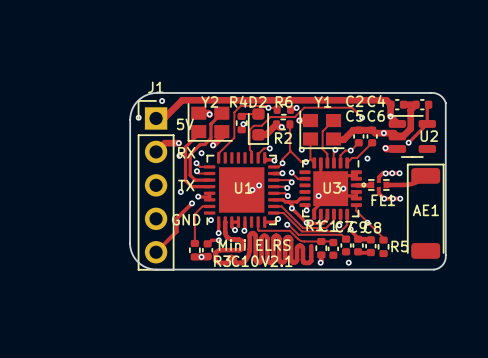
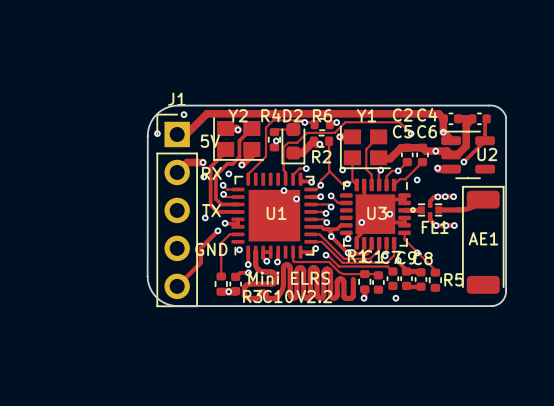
via: none -> (284, 190)
via: none -> (296, 198)
via: (259, 185) -> none
via: (252, 189) -> none
text: V2.1 (276, 261) -> V2.2 (314, 296)

